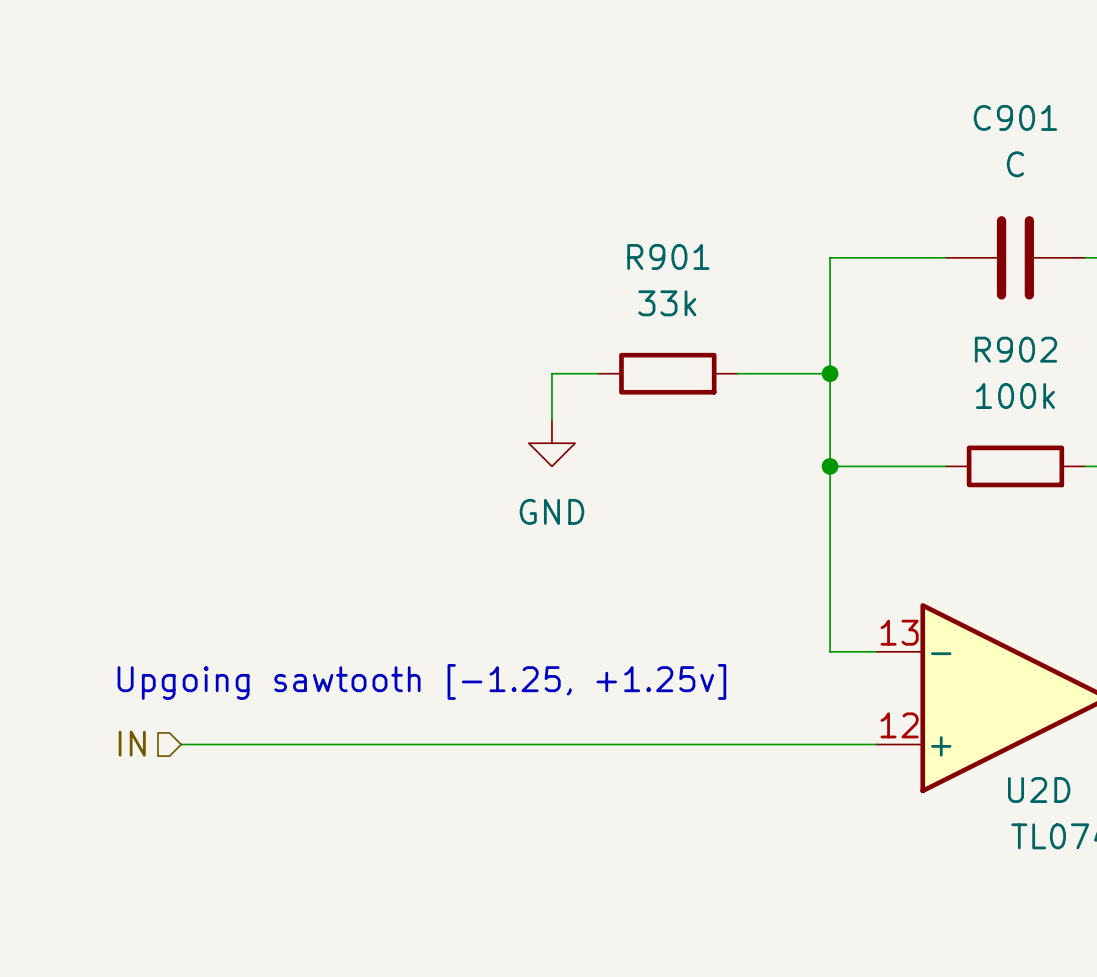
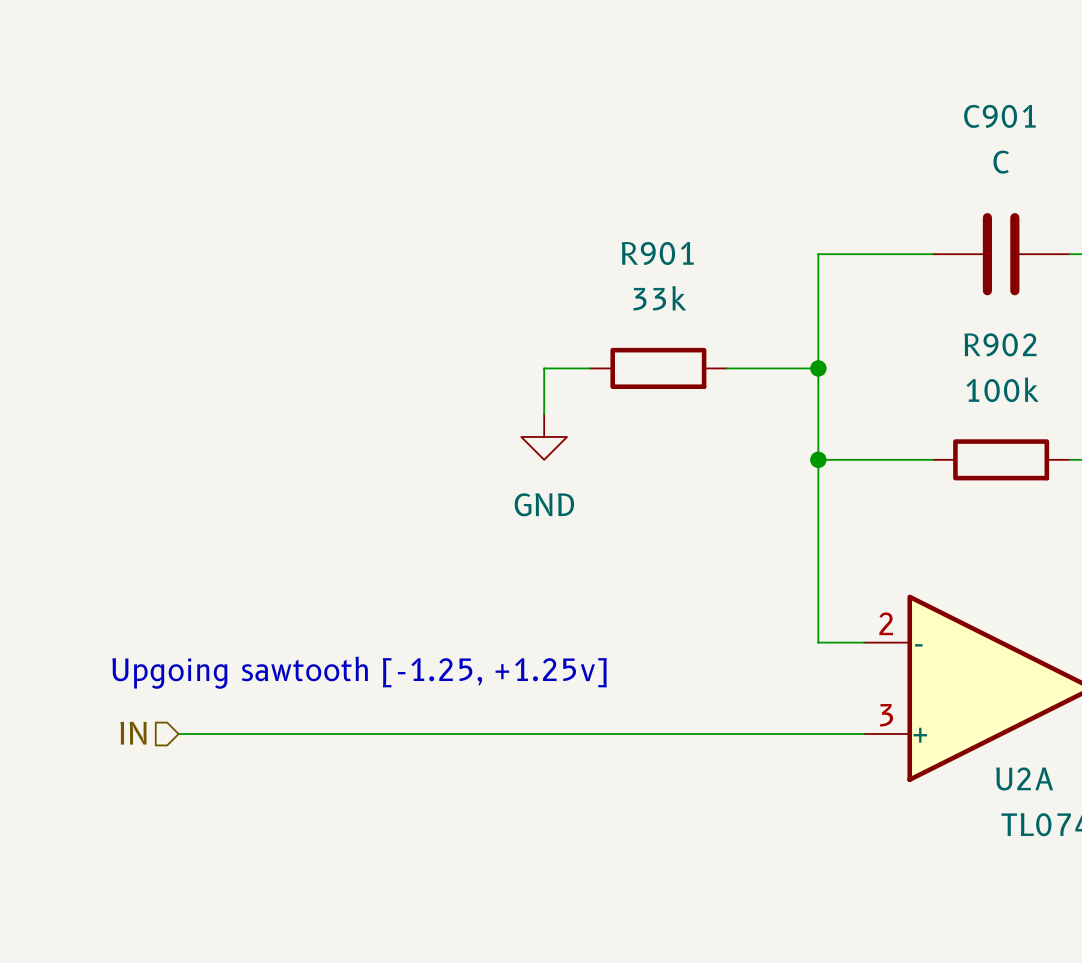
U2D pin number: 13 (899, 632) -> 2 (886, 623)
U2D pin number: 12 (899, 725) -> 3 (886, 715)
U2D name: U2D (1039, 790) -> U2A (1024, 778)

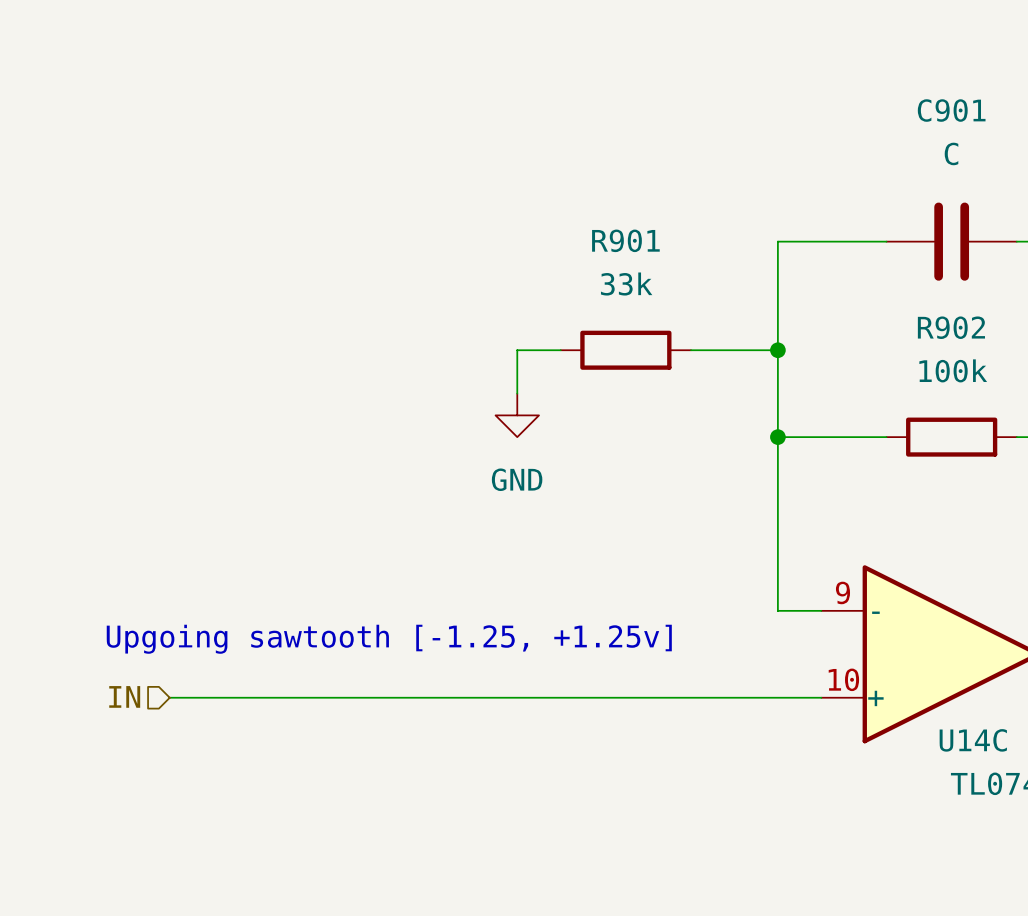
U2A pin number: 2 (886, 623) -> 9 (842, 592)
U2A pin number: 3 (886, 715) -> 10 (843, 679)
U2A name: U2A (1024, 778) -> U14C (973, 740)

